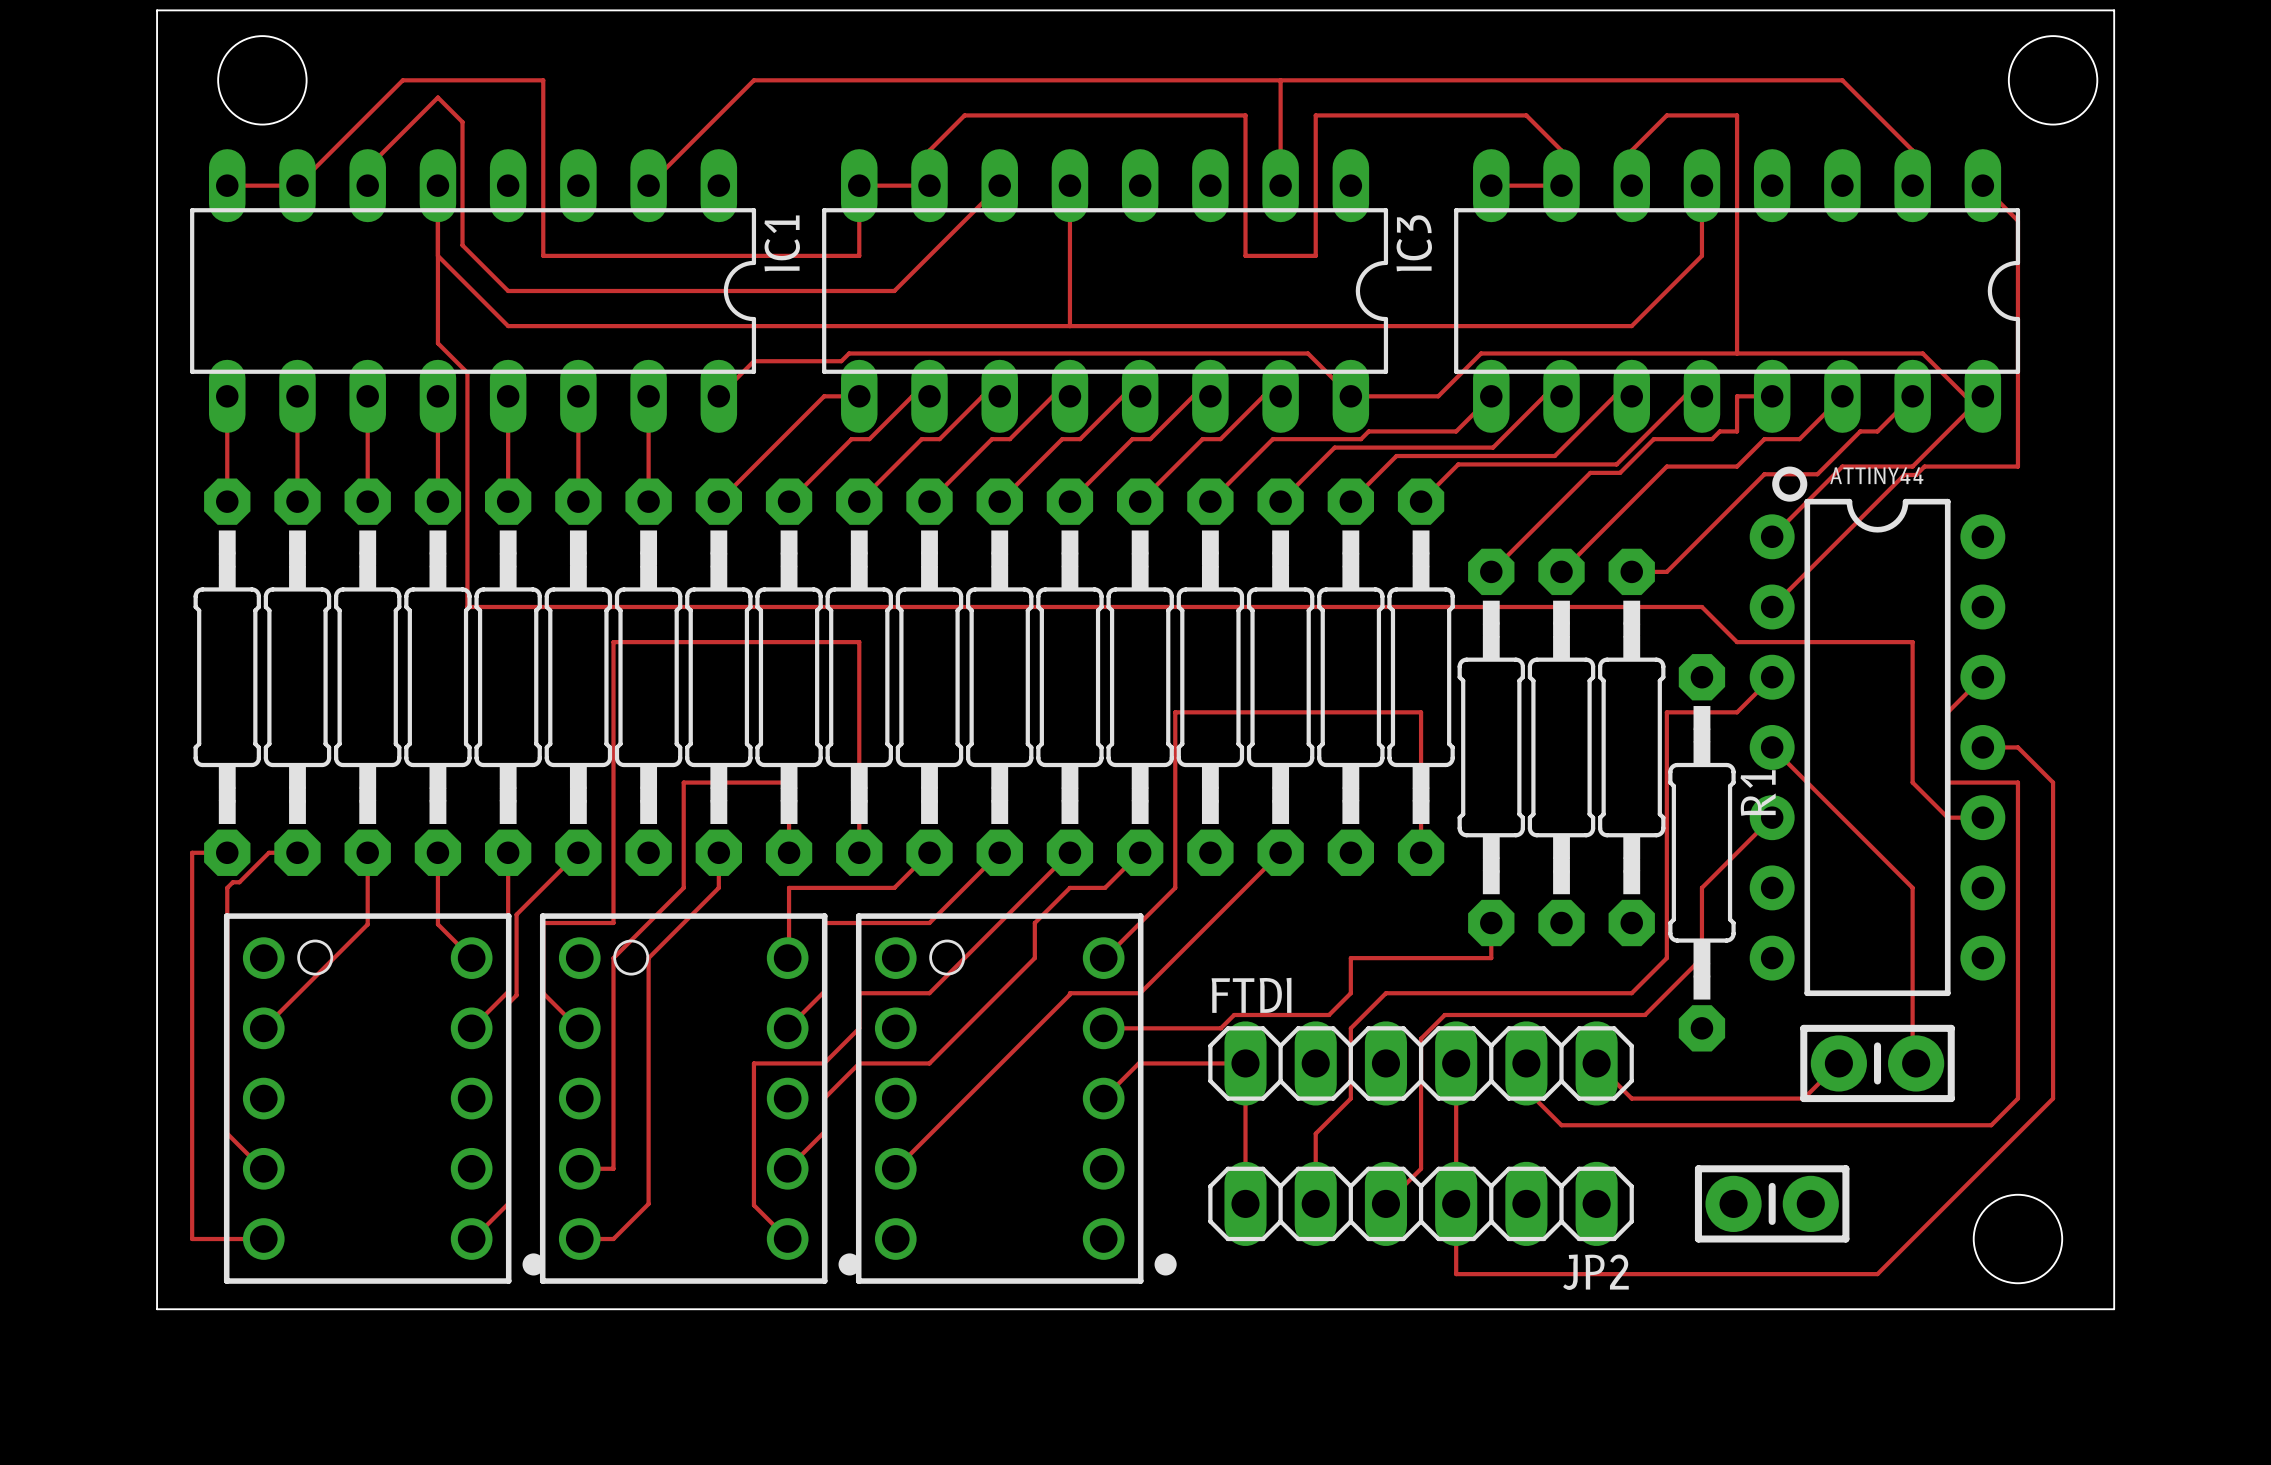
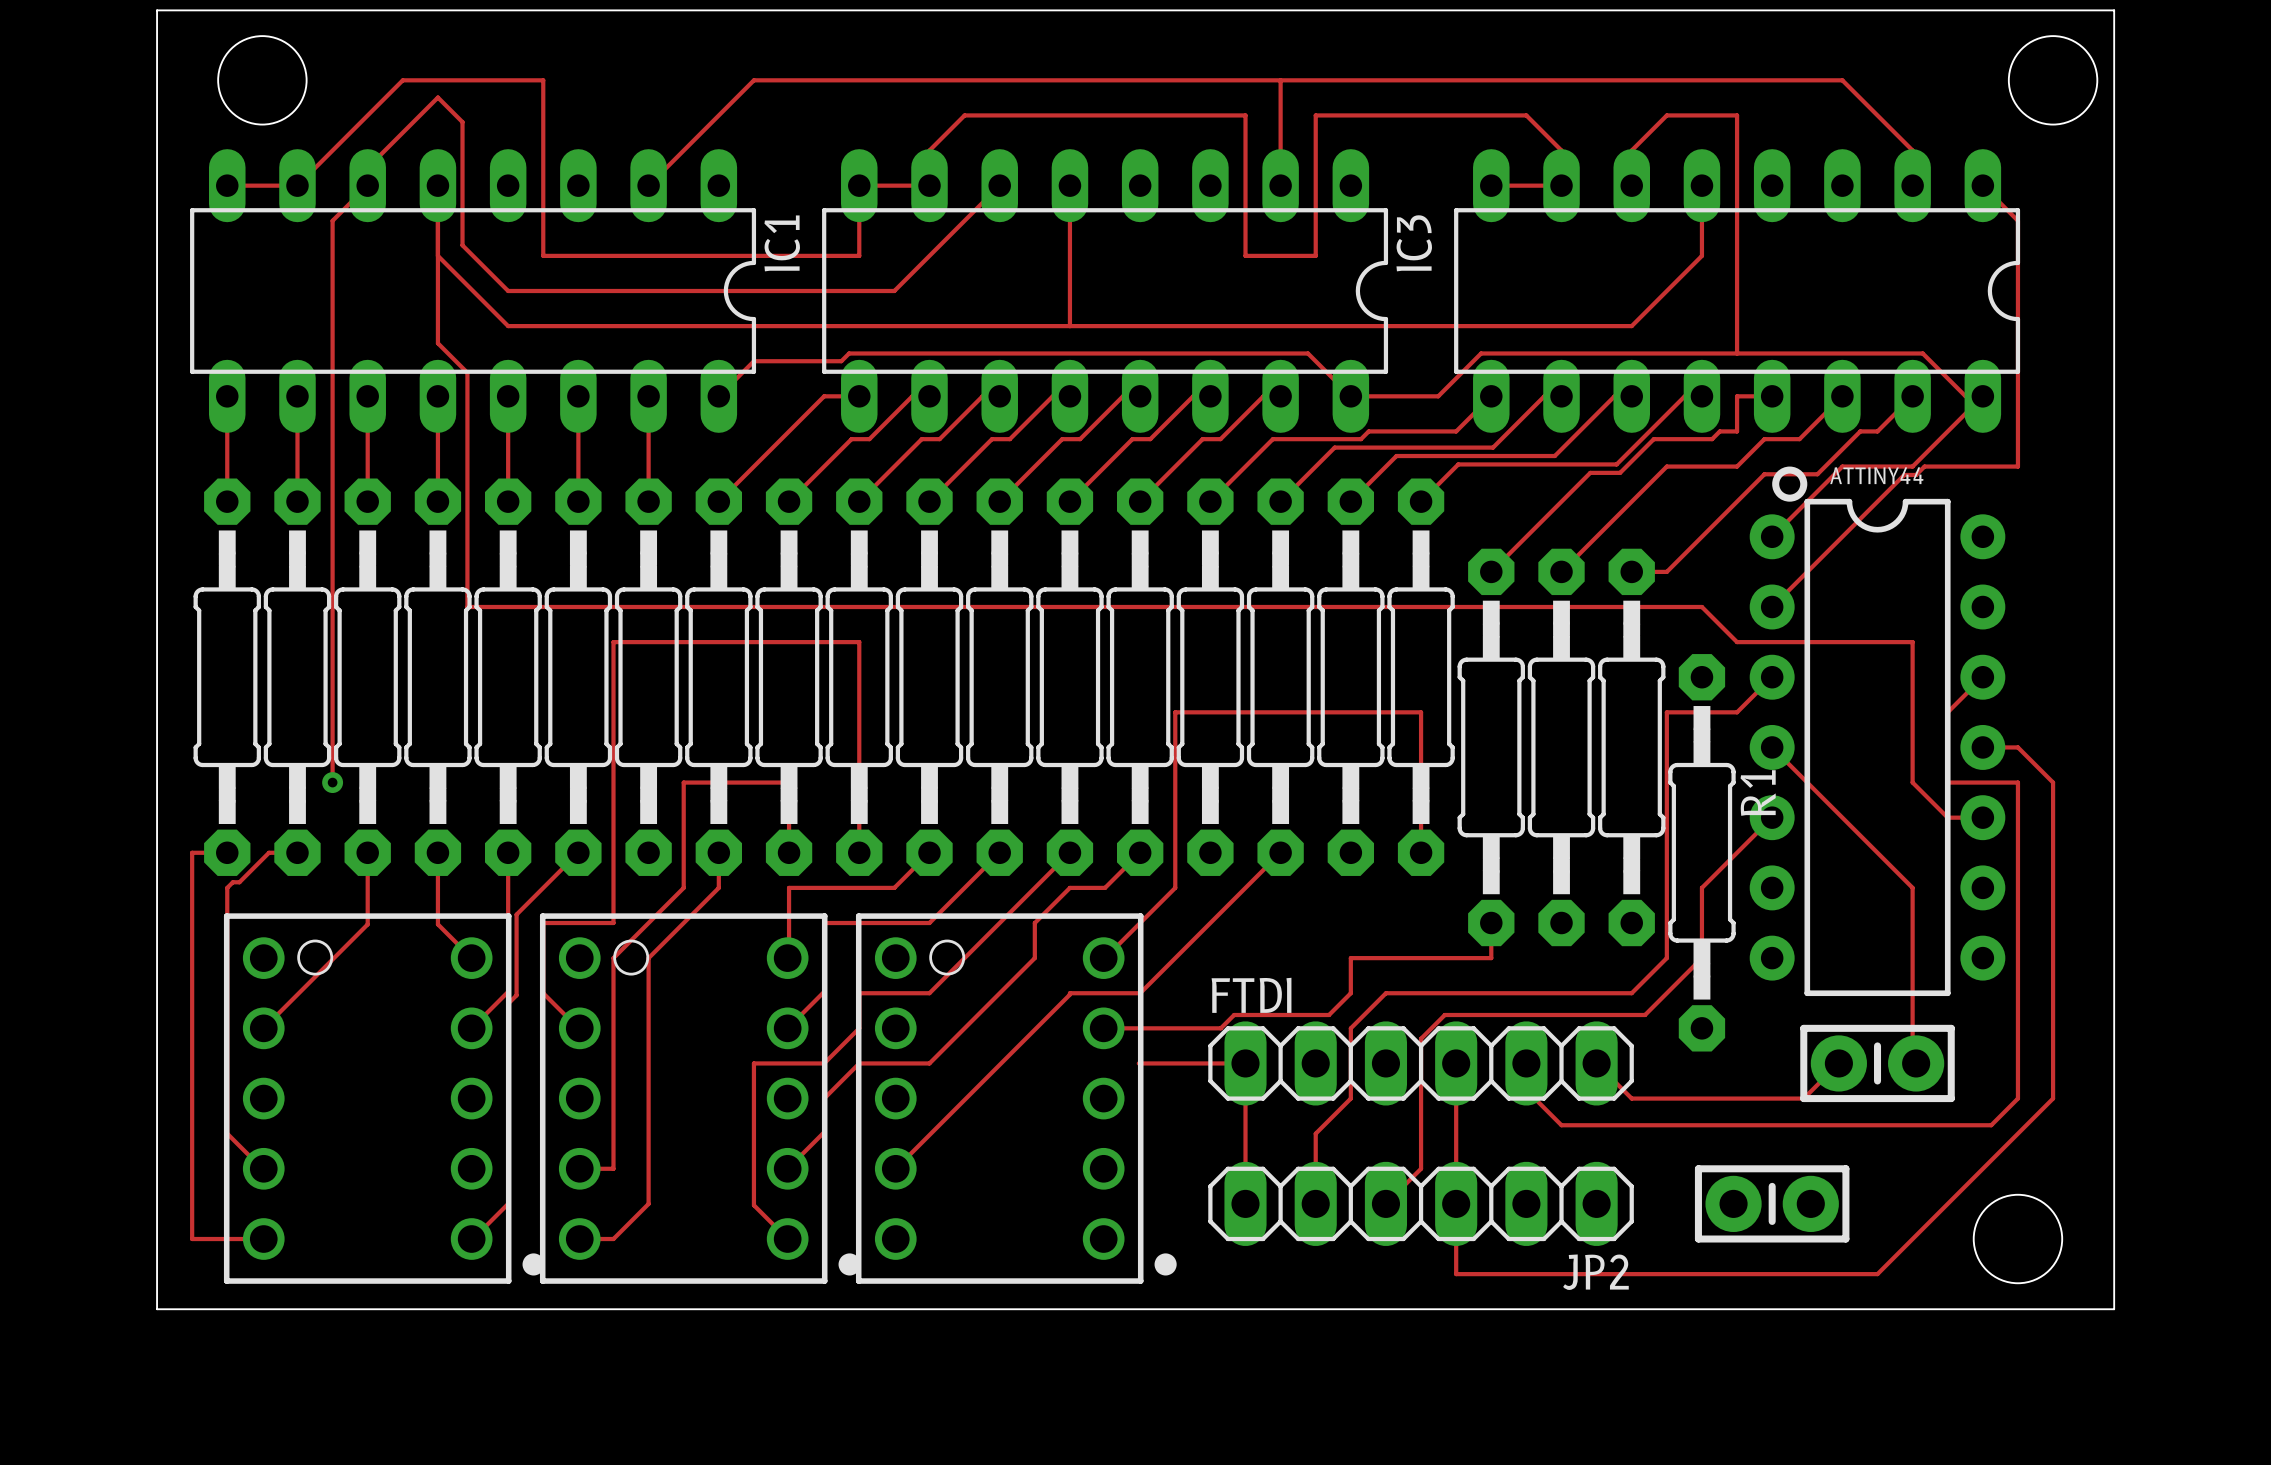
track: none -> (367, 185) (332, 220) (332, 782)
via: none -> (332, 782)
track: (1138, 1063) (1103, 1098) -> none

